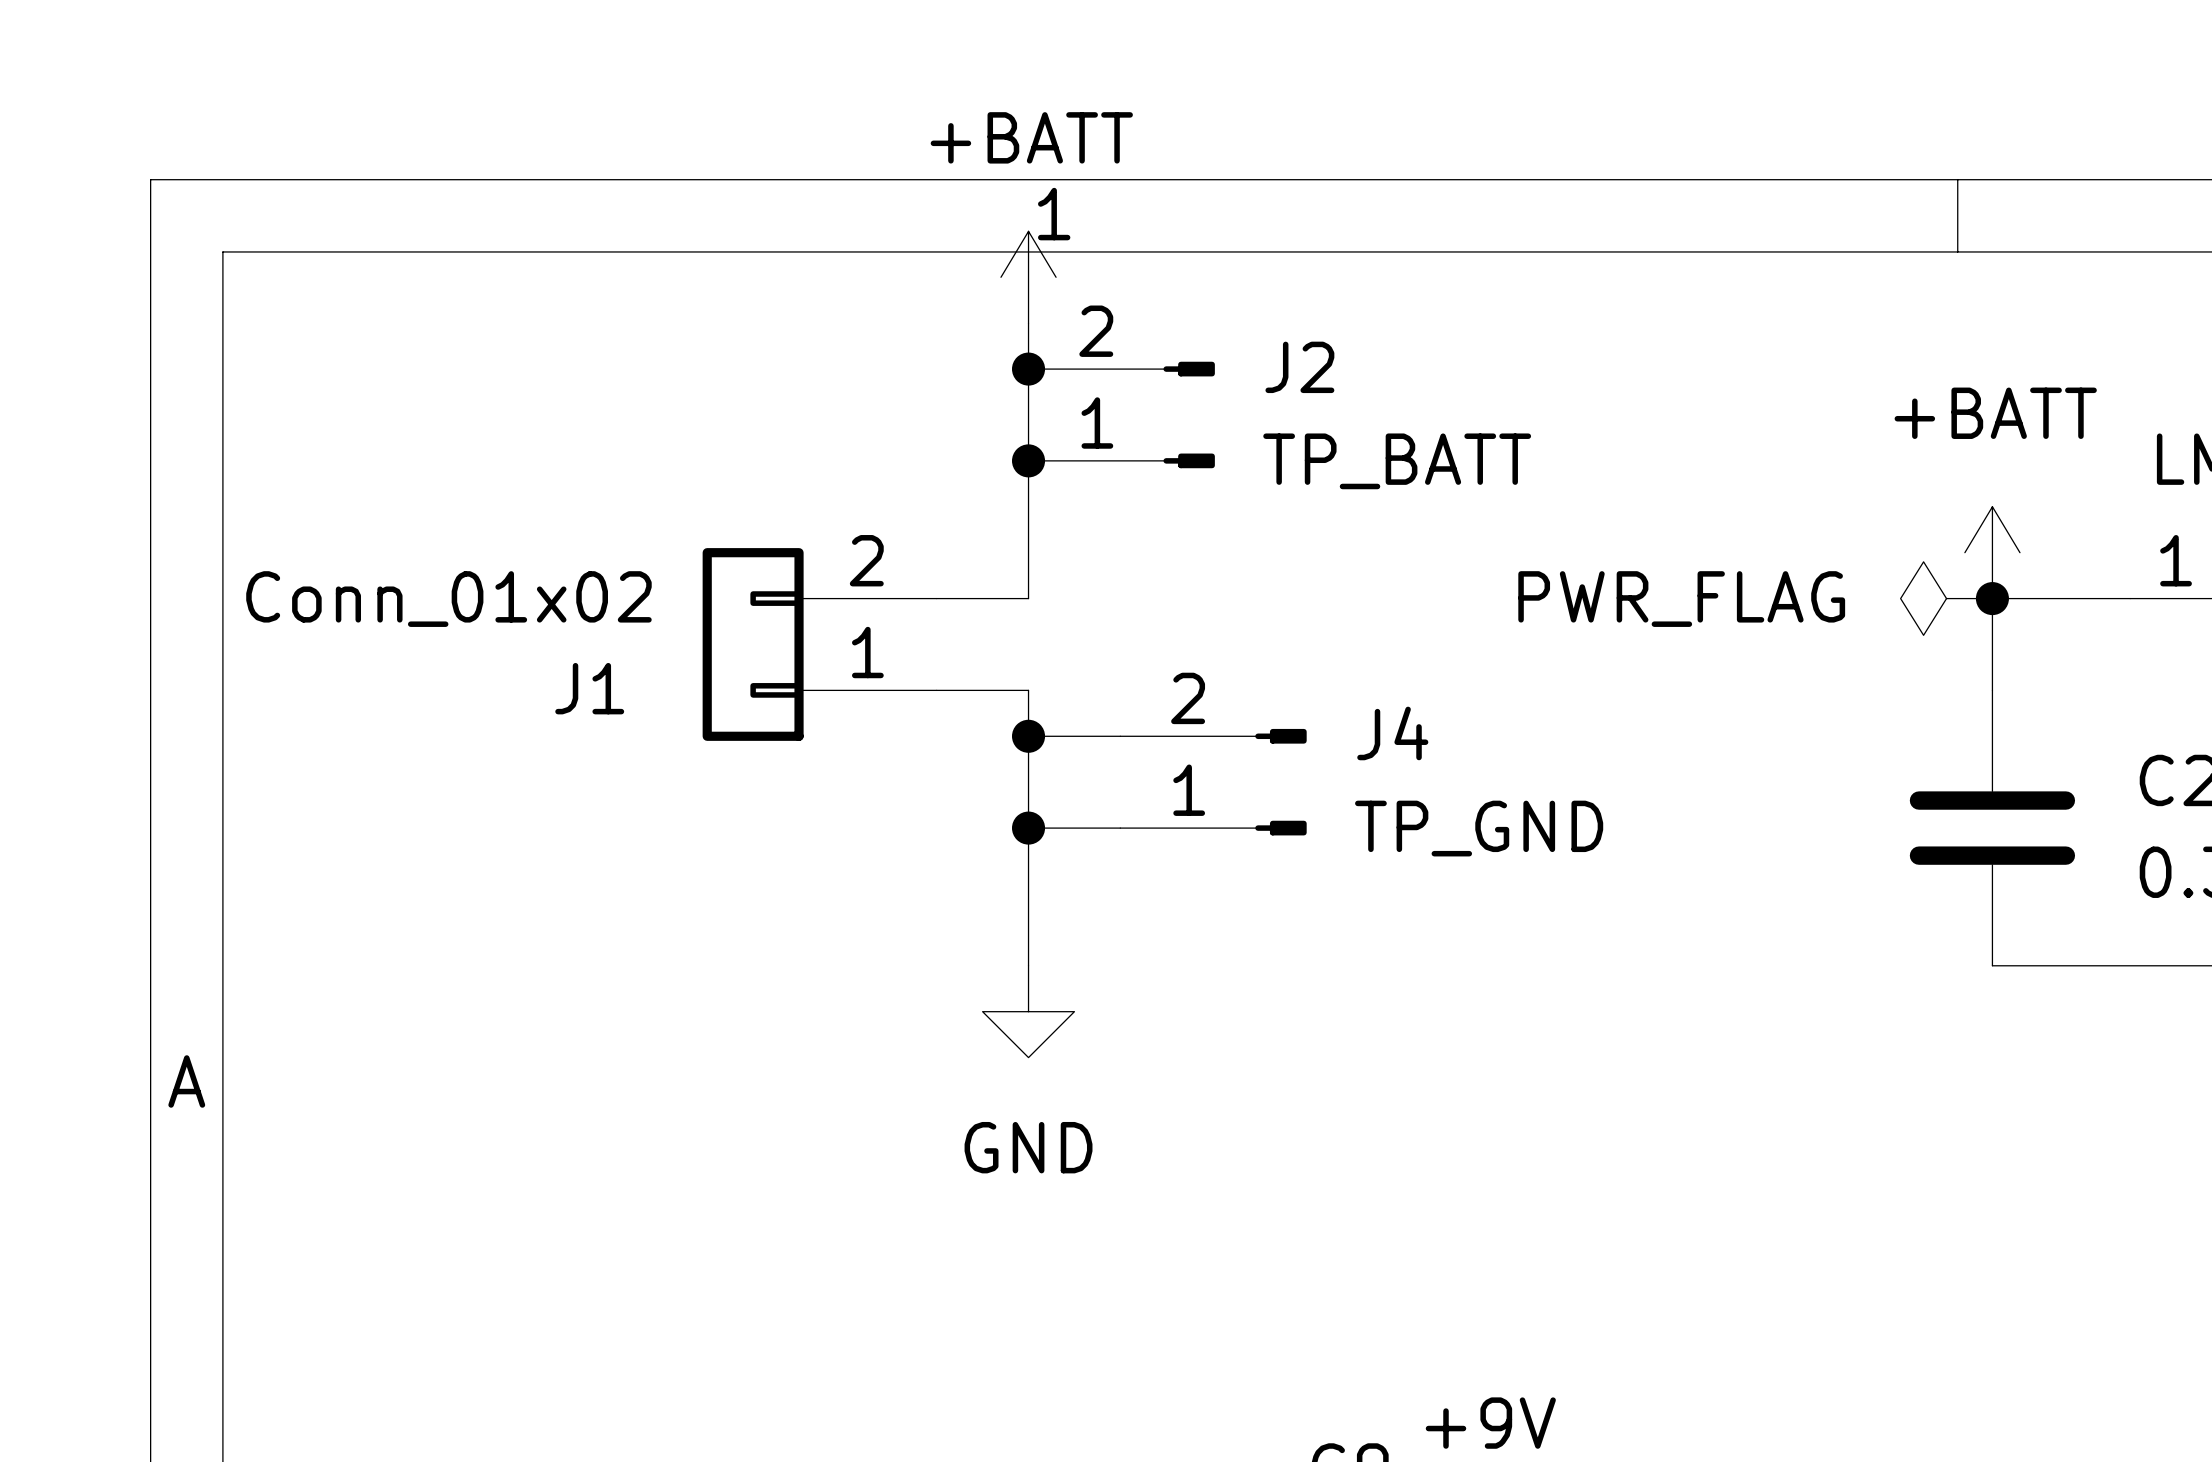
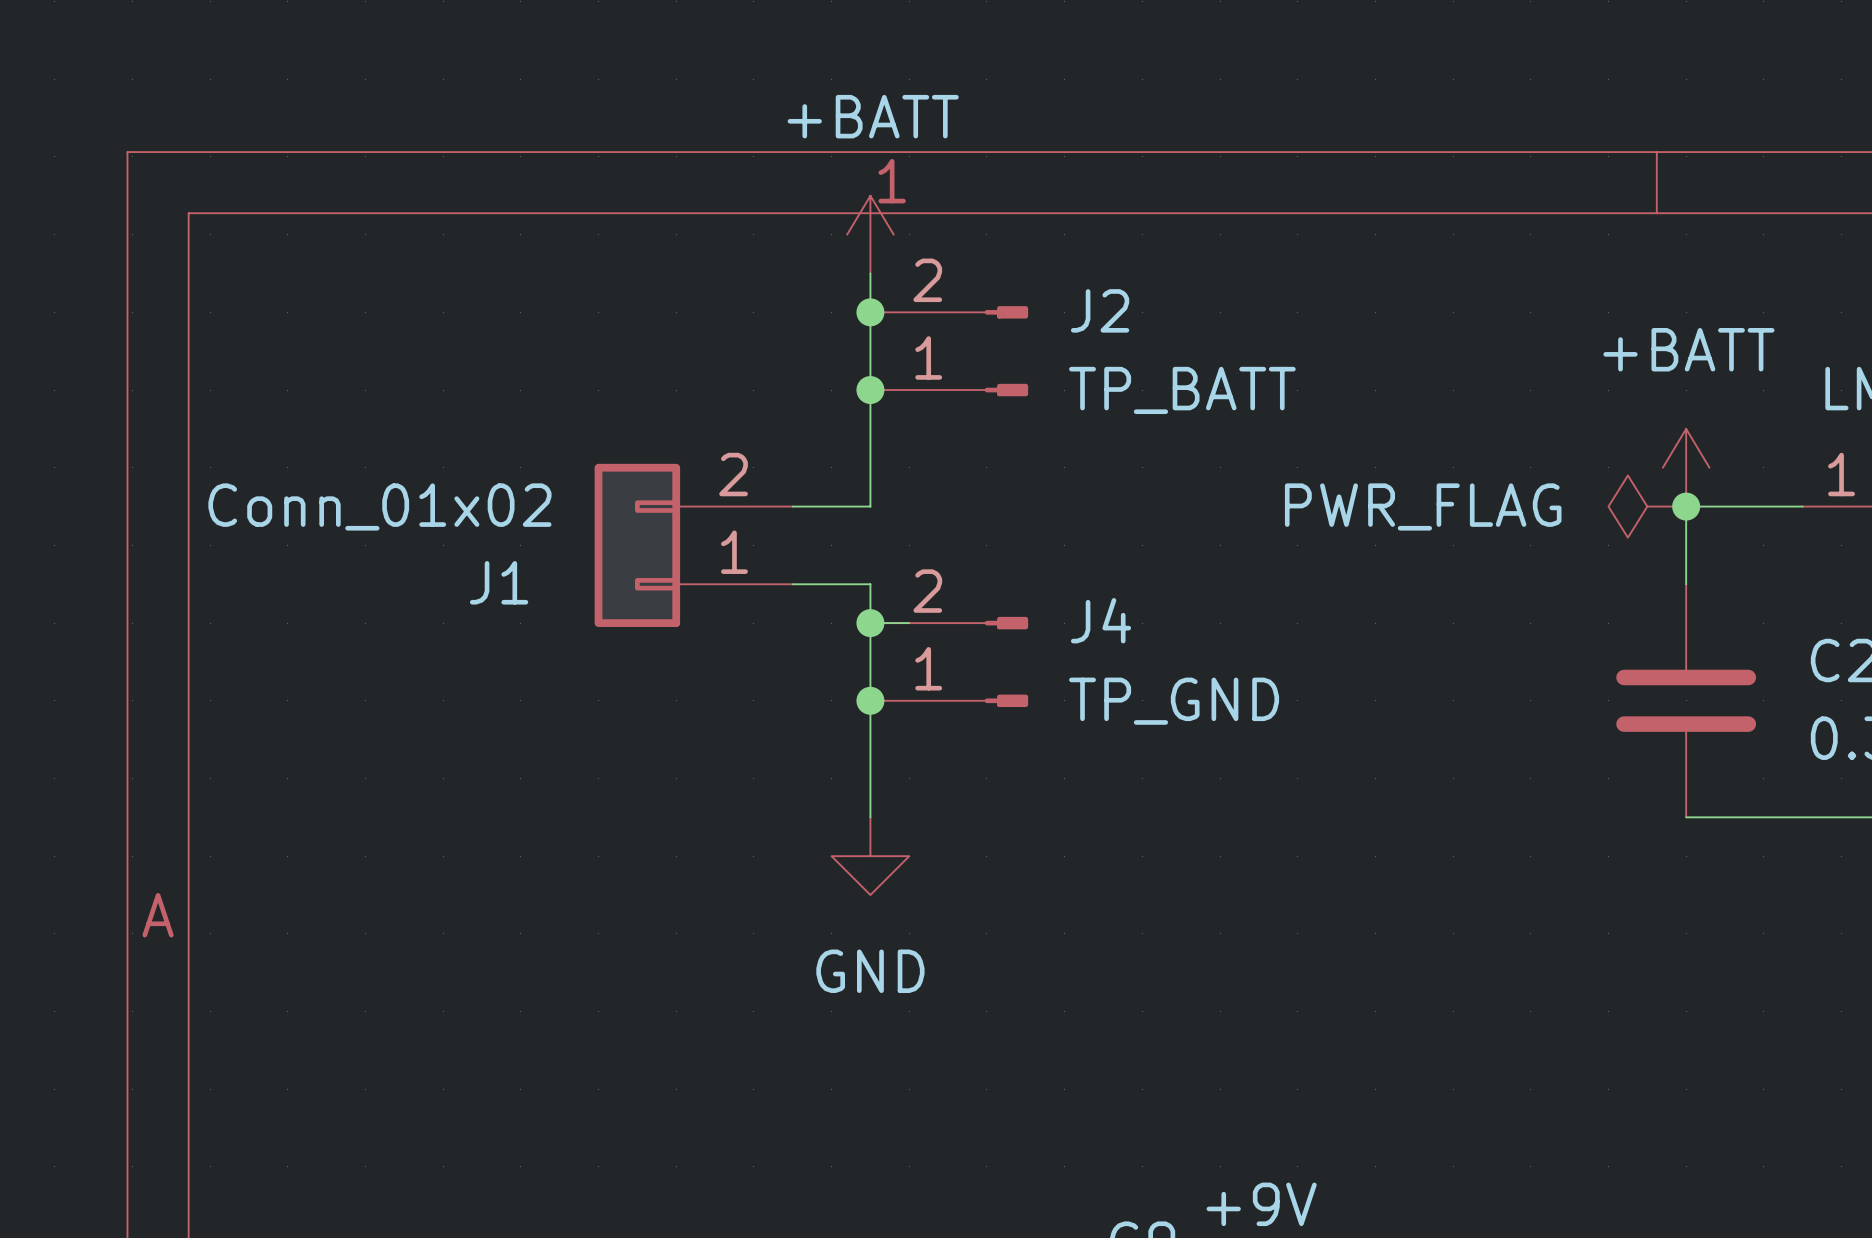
J4 position: (1213, 782) -> (949, 661)

